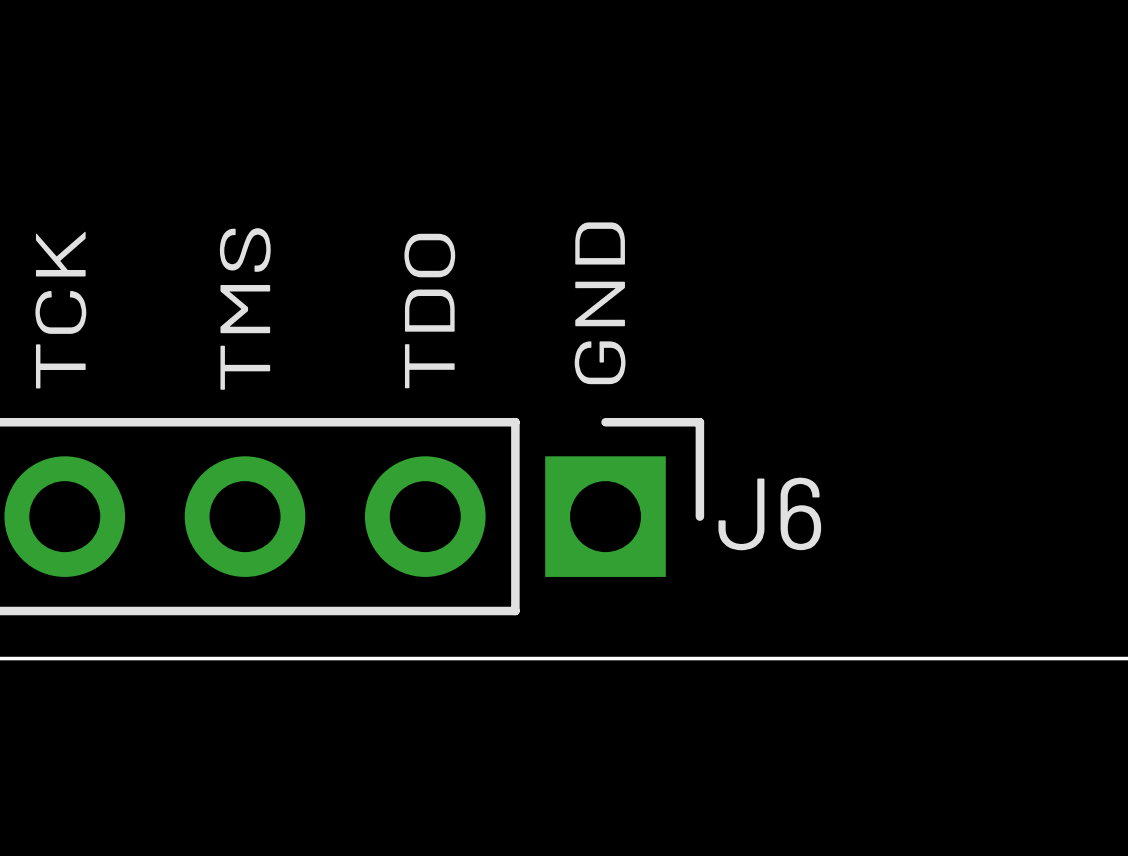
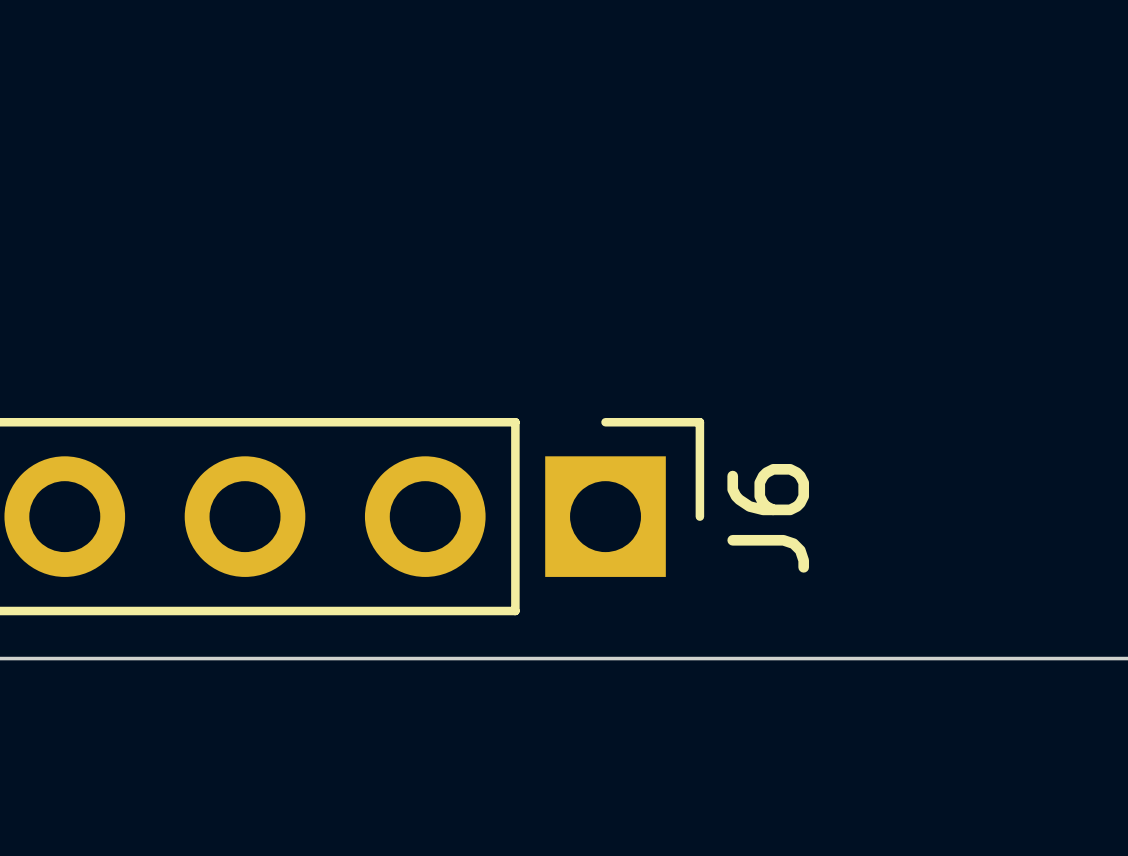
text: GND (600, 303) -> none
text: TMS (245, 308) -> none
text: TCK (60, 310) -> none
text: TDO (429, 311) -> none
J6 name rotation: 0° (769, 513) -> 90° counterclockwise (768, 518)

